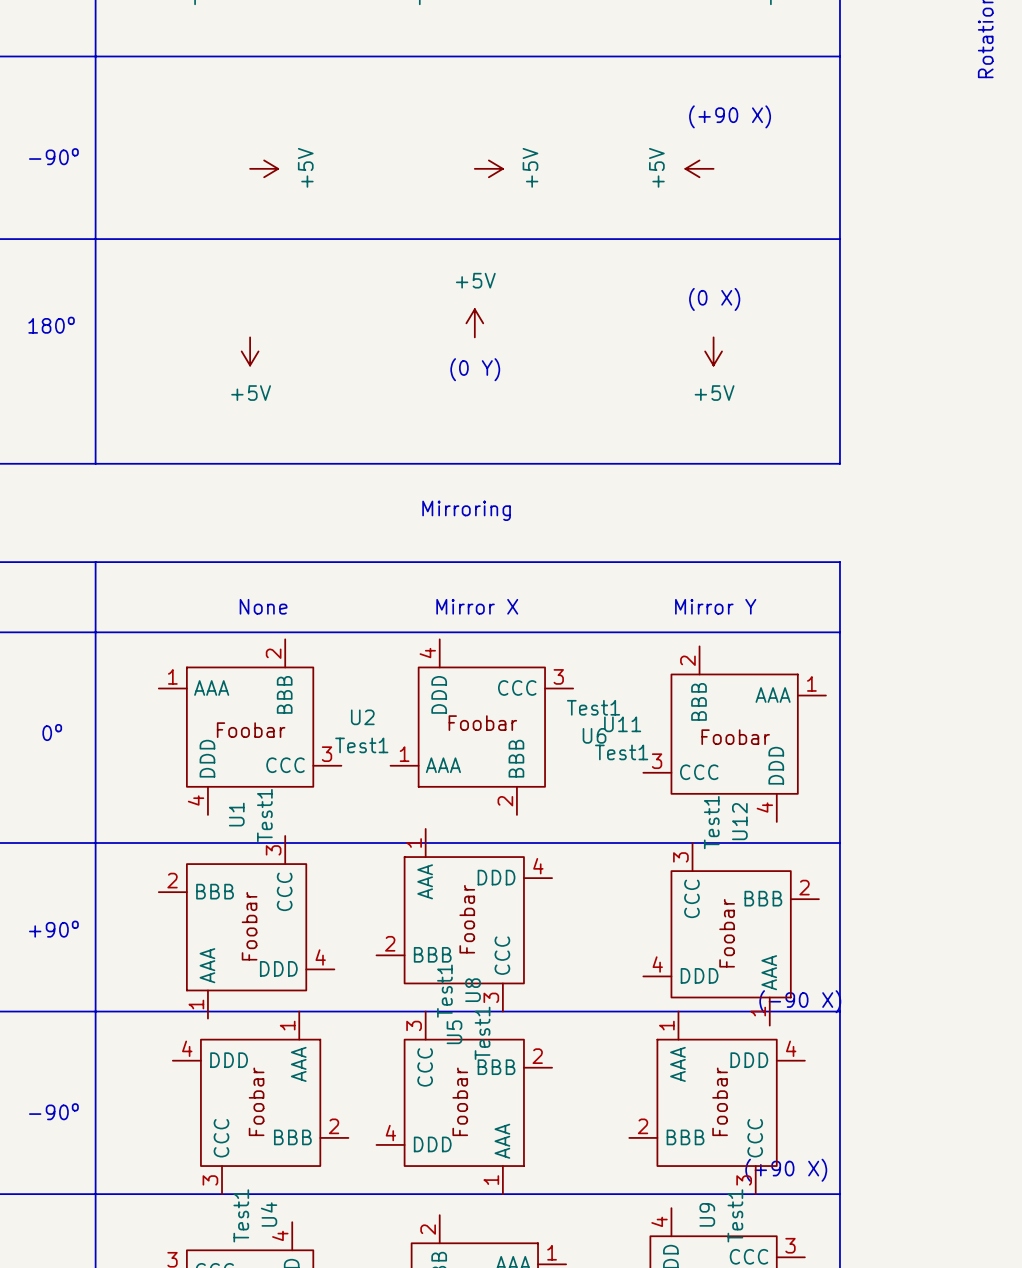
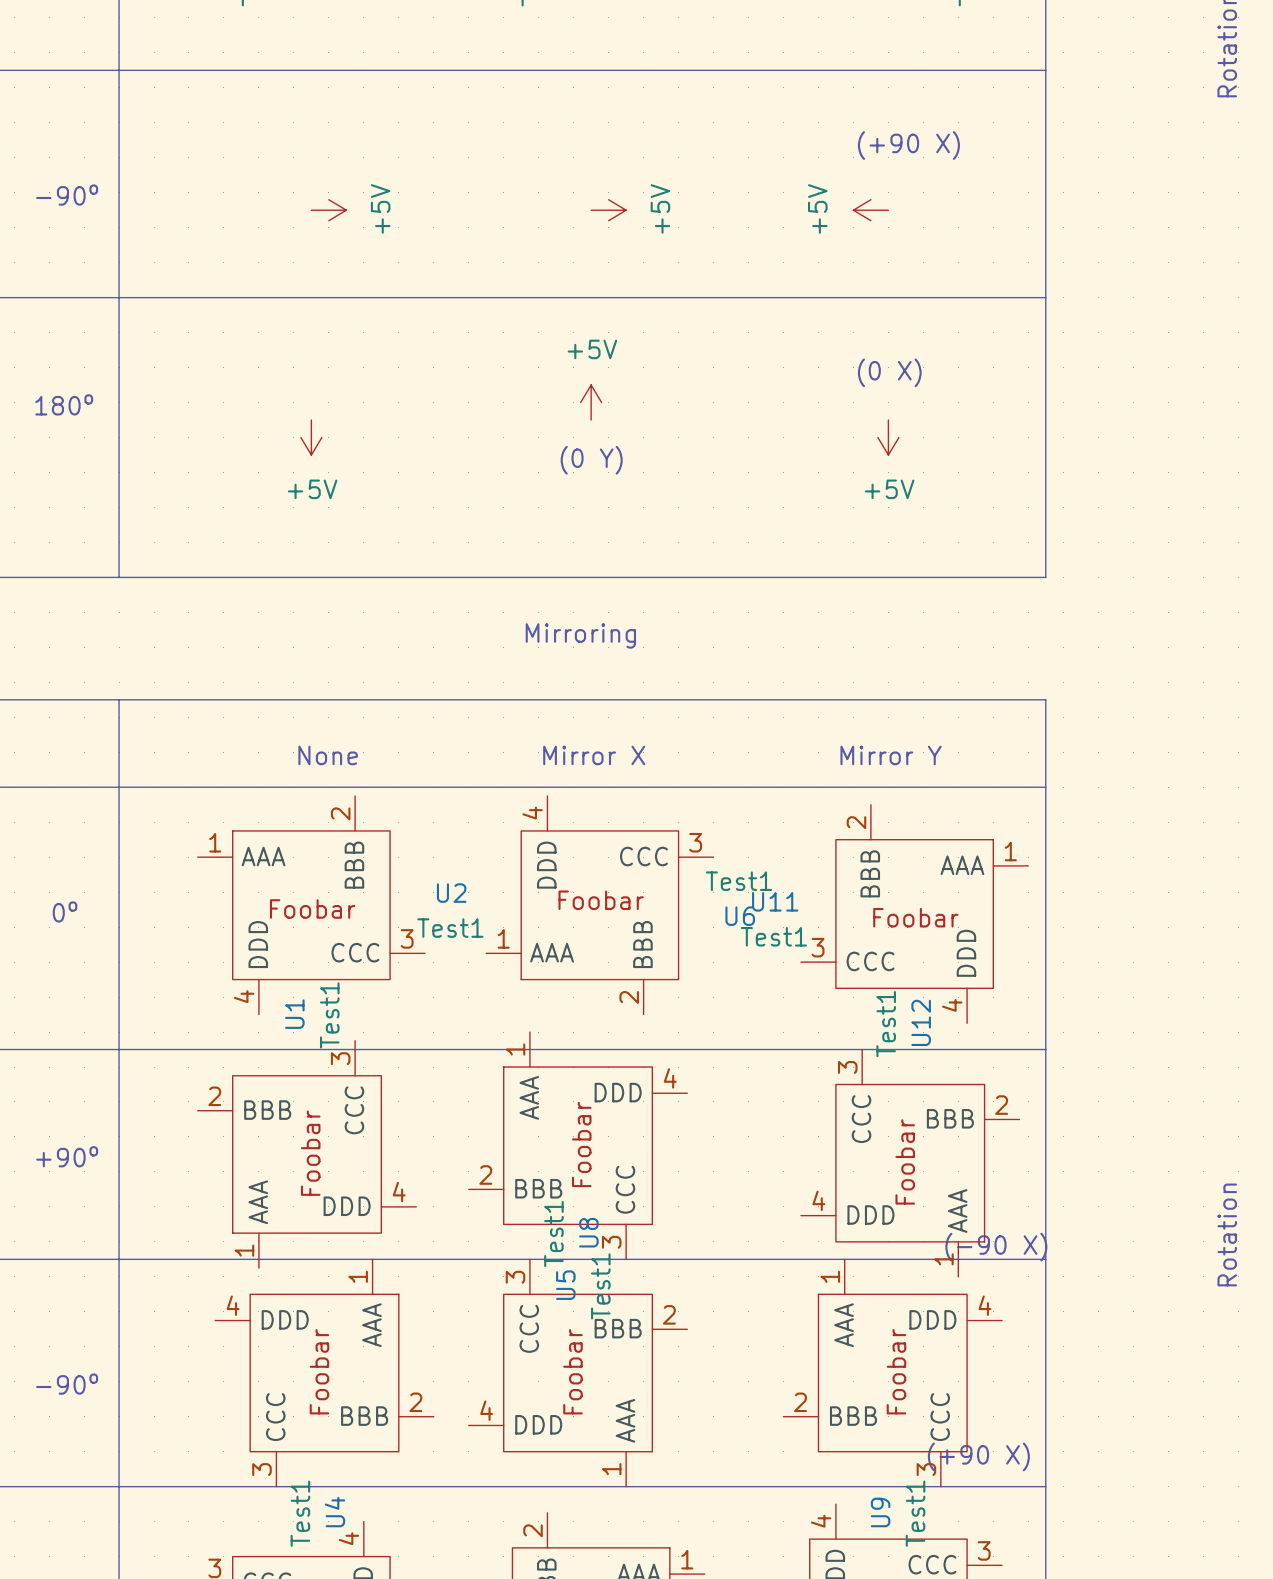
text: none -> Rotation (1227, 1234)

